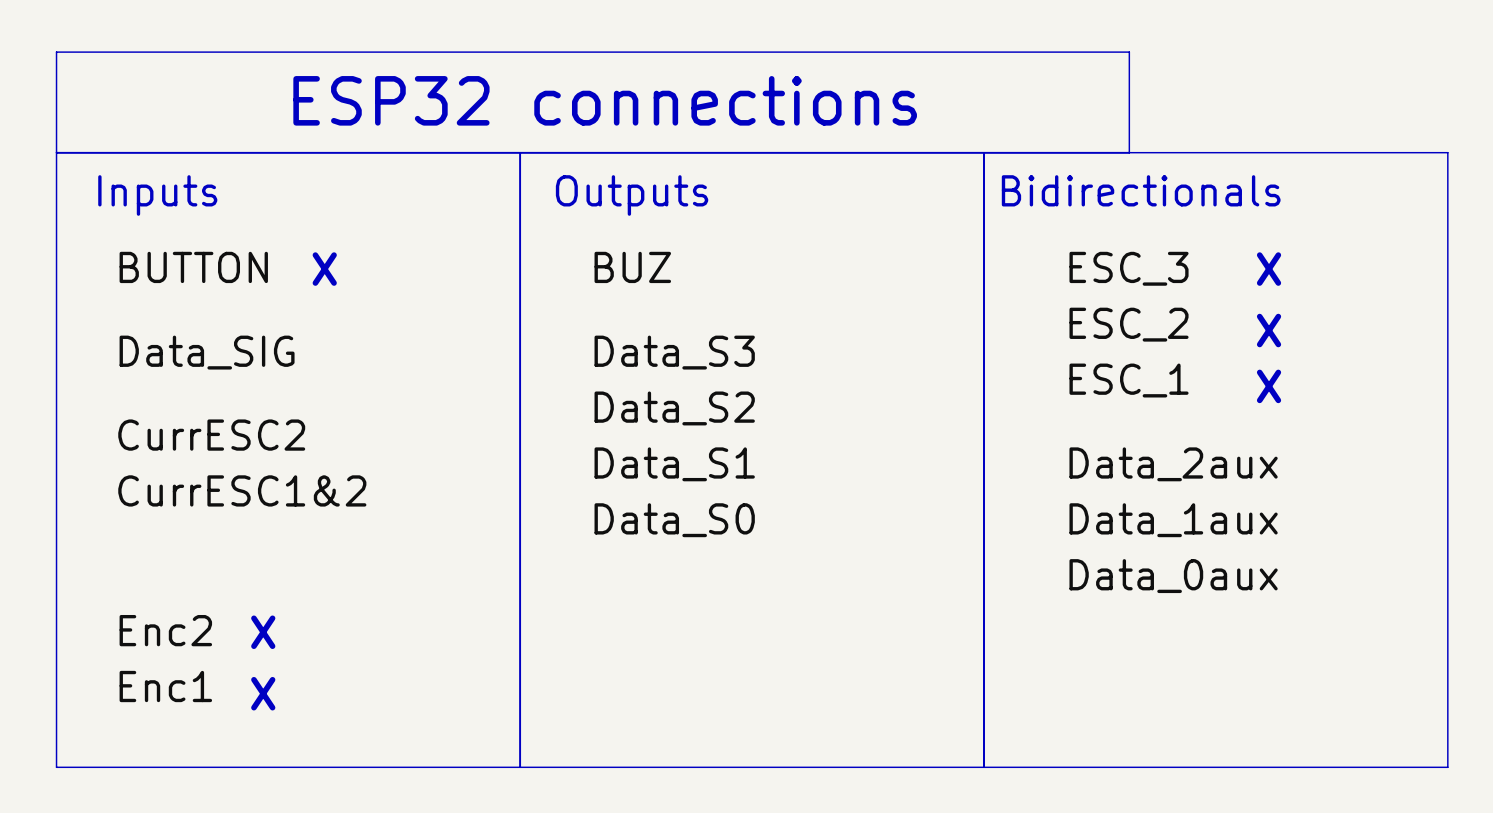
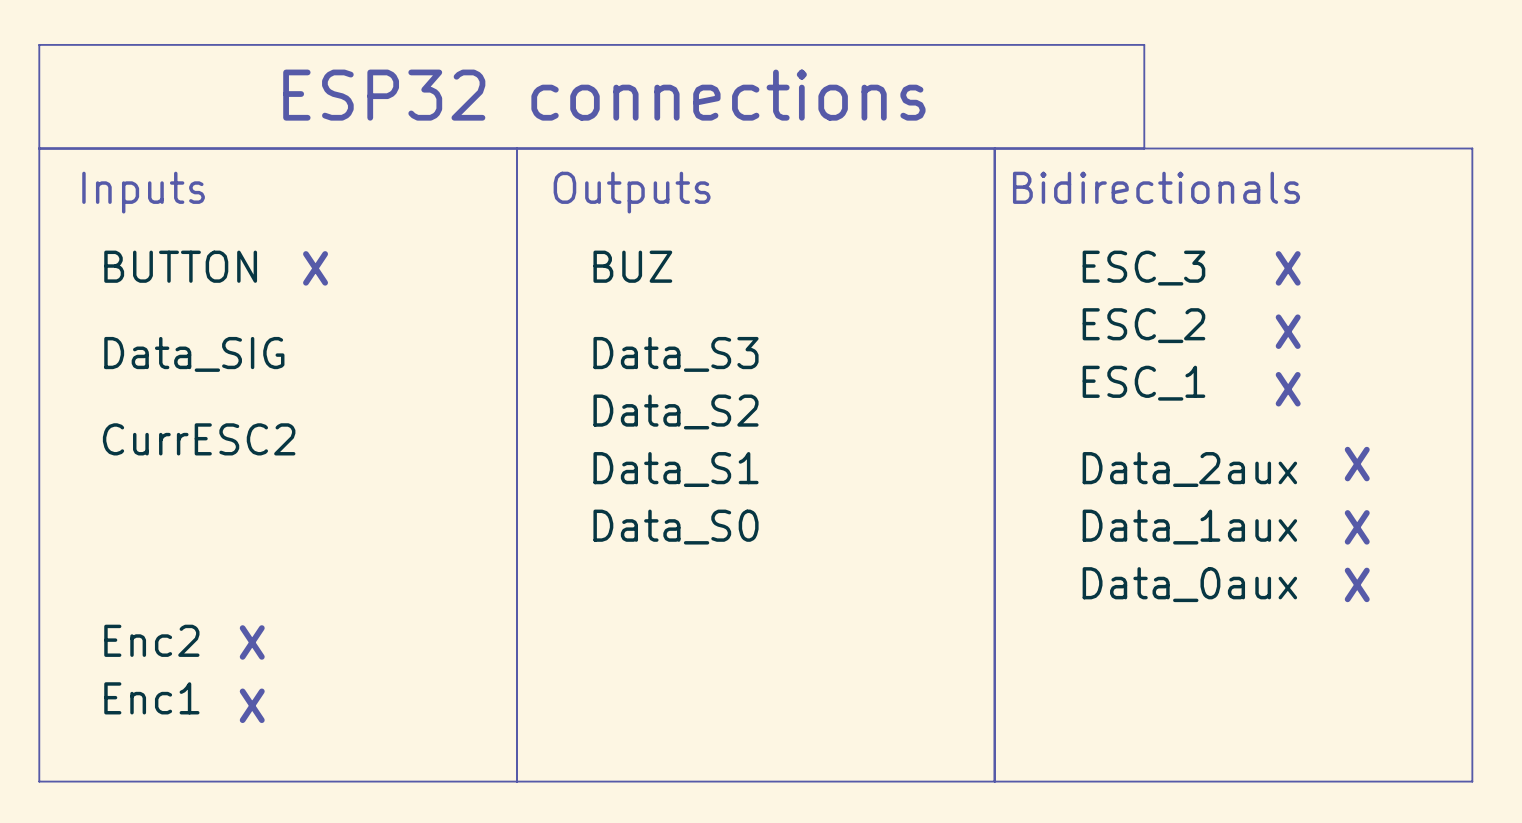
text: none -> X (1357, 464)
label: CurrESC1&2 (242, 490) -> none
text: none -> X (1357, 527)
text: none -> X (1357, 584)

